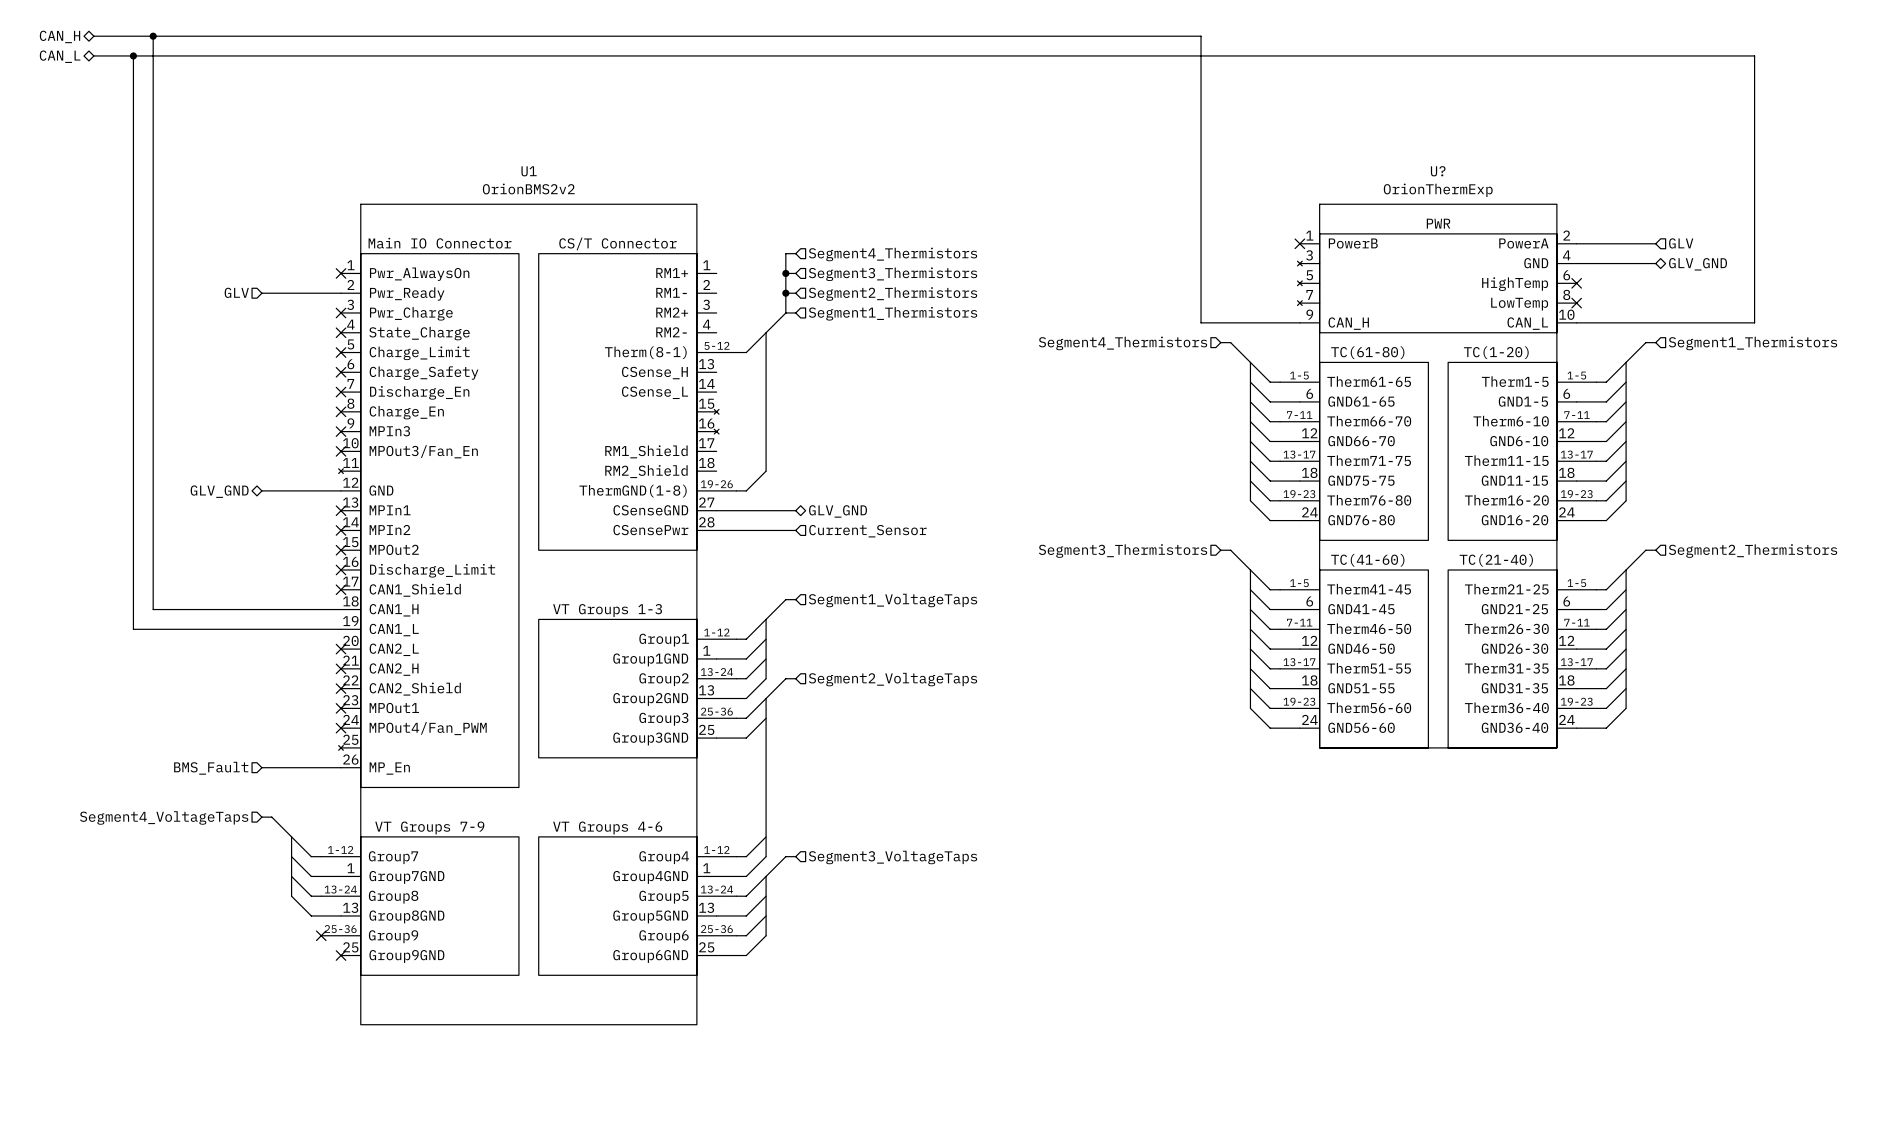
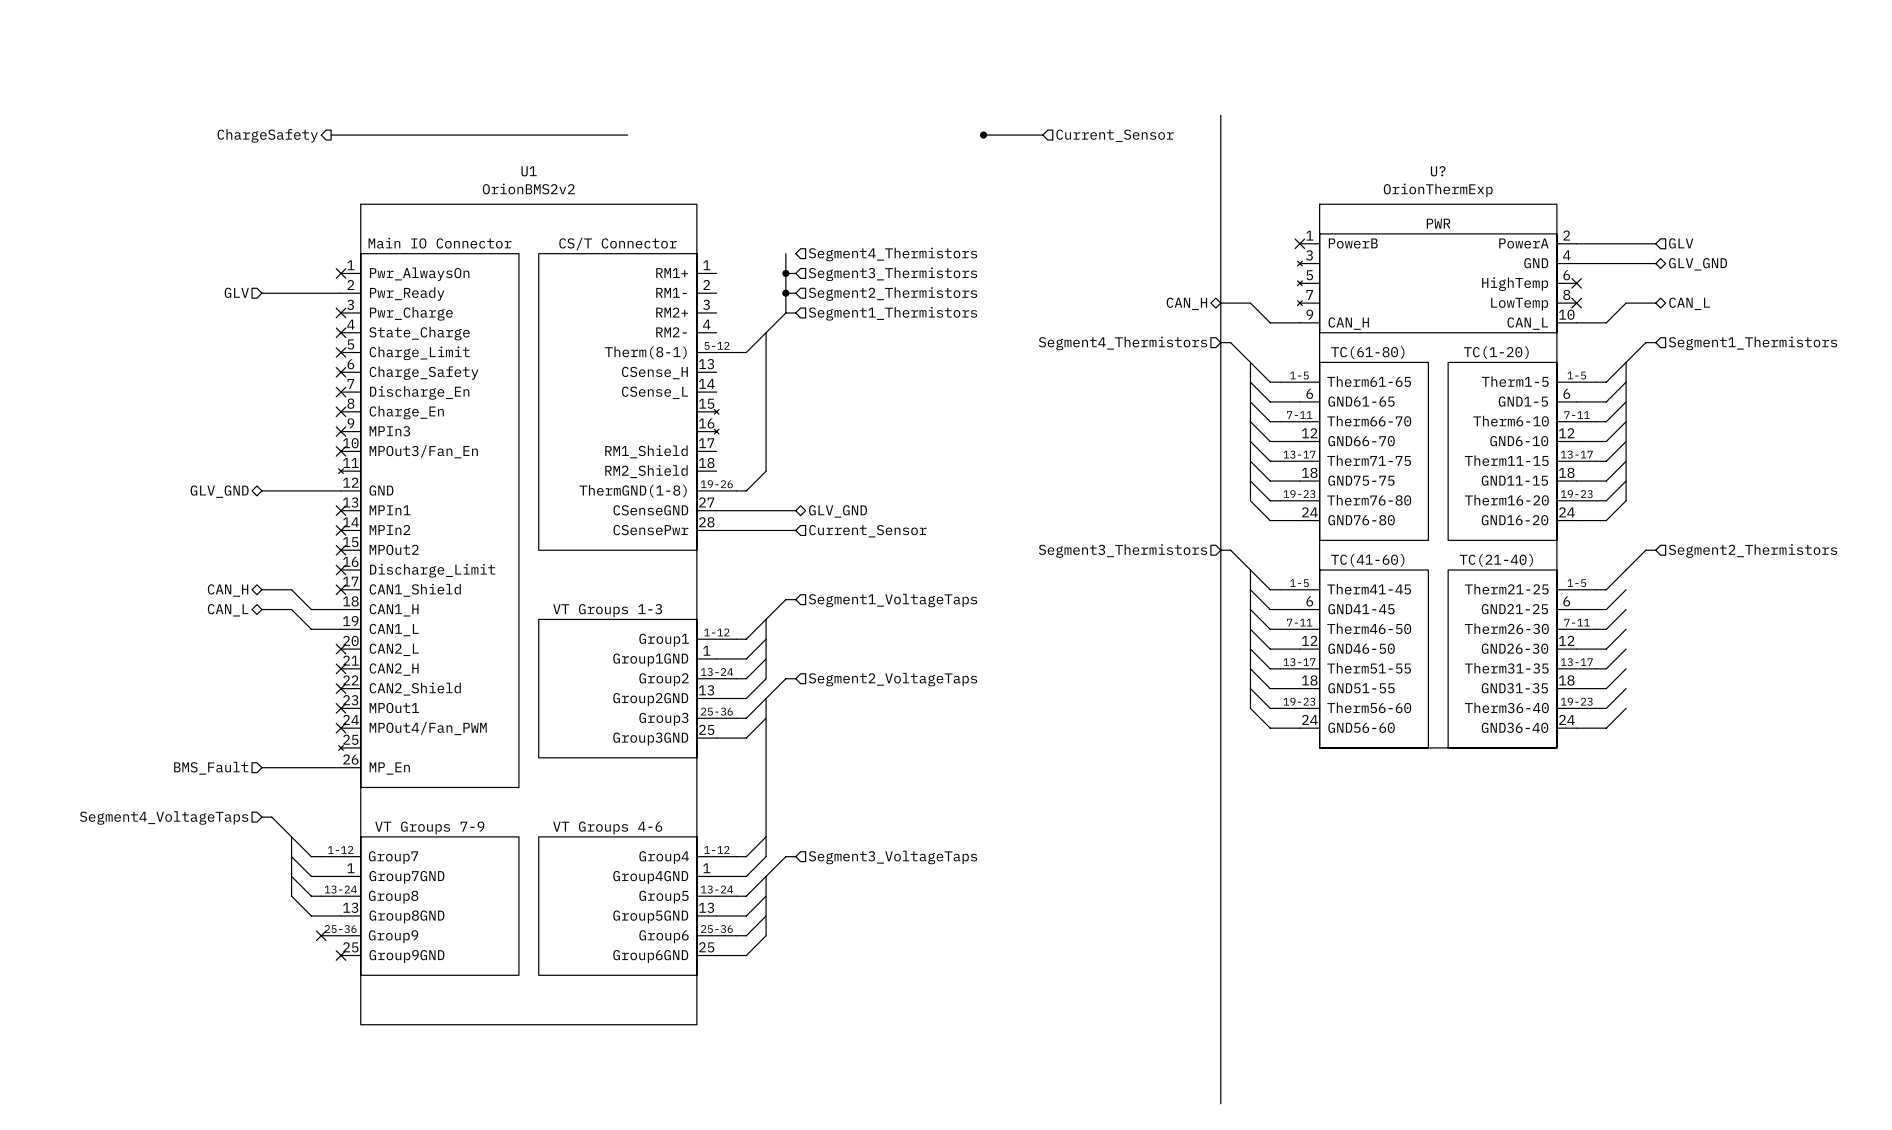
hierarchical label: CAN_H (60, 36) -> none
wire: (93, 36) (1201, 36) (1201, 322) (1270, 322) -> (1250, 303) (1270, 322)
wire: (153, 36) (153, 609) (311, 609) -> (291, 589) (311, 609)
junction: (153, 36) -> none
wire: (93, 55) (1754, 55) (1754, 322) (1606, 322) -> (1626, 303) (1606, 322)
wire: (133, 55) (133, 629) (311, 629) -> (291, 609) (311, 629)
junction: (133, 55) -> none
hierarchical label: CAN_L (60, 56) -> none
bus: none -> (1220, 115) (1220, 1103)
hierarchical label: none -> ChargeSafety (267, 135)
wire: none -> (331, 135) (627, 135)
bus: none -> (983, 135) (1042, 135)
junction: none -> (983, 135)
hierarchical label: none -> Current_Sensor (1115, 135)
bus: (785, 253) (795, 253) -> none
hierarchical label: none -> CAN_H (1186, 303)
bus: none -> (1220, 303) (1250, 303)
bus: none -> (1626, 303) (1655, 303)
hierarchical label: none -> CAN_L (1689, 303)
bus: (1626, 570) (1626, 708) -> none
bus: none -> (261, 589) (291, 589)
hierarchical label: none -> CAN_H (228, 590)
bus: none -> (261, 609) (291, 609)
hierarchical label: none -> CAN_L (228, 610)

